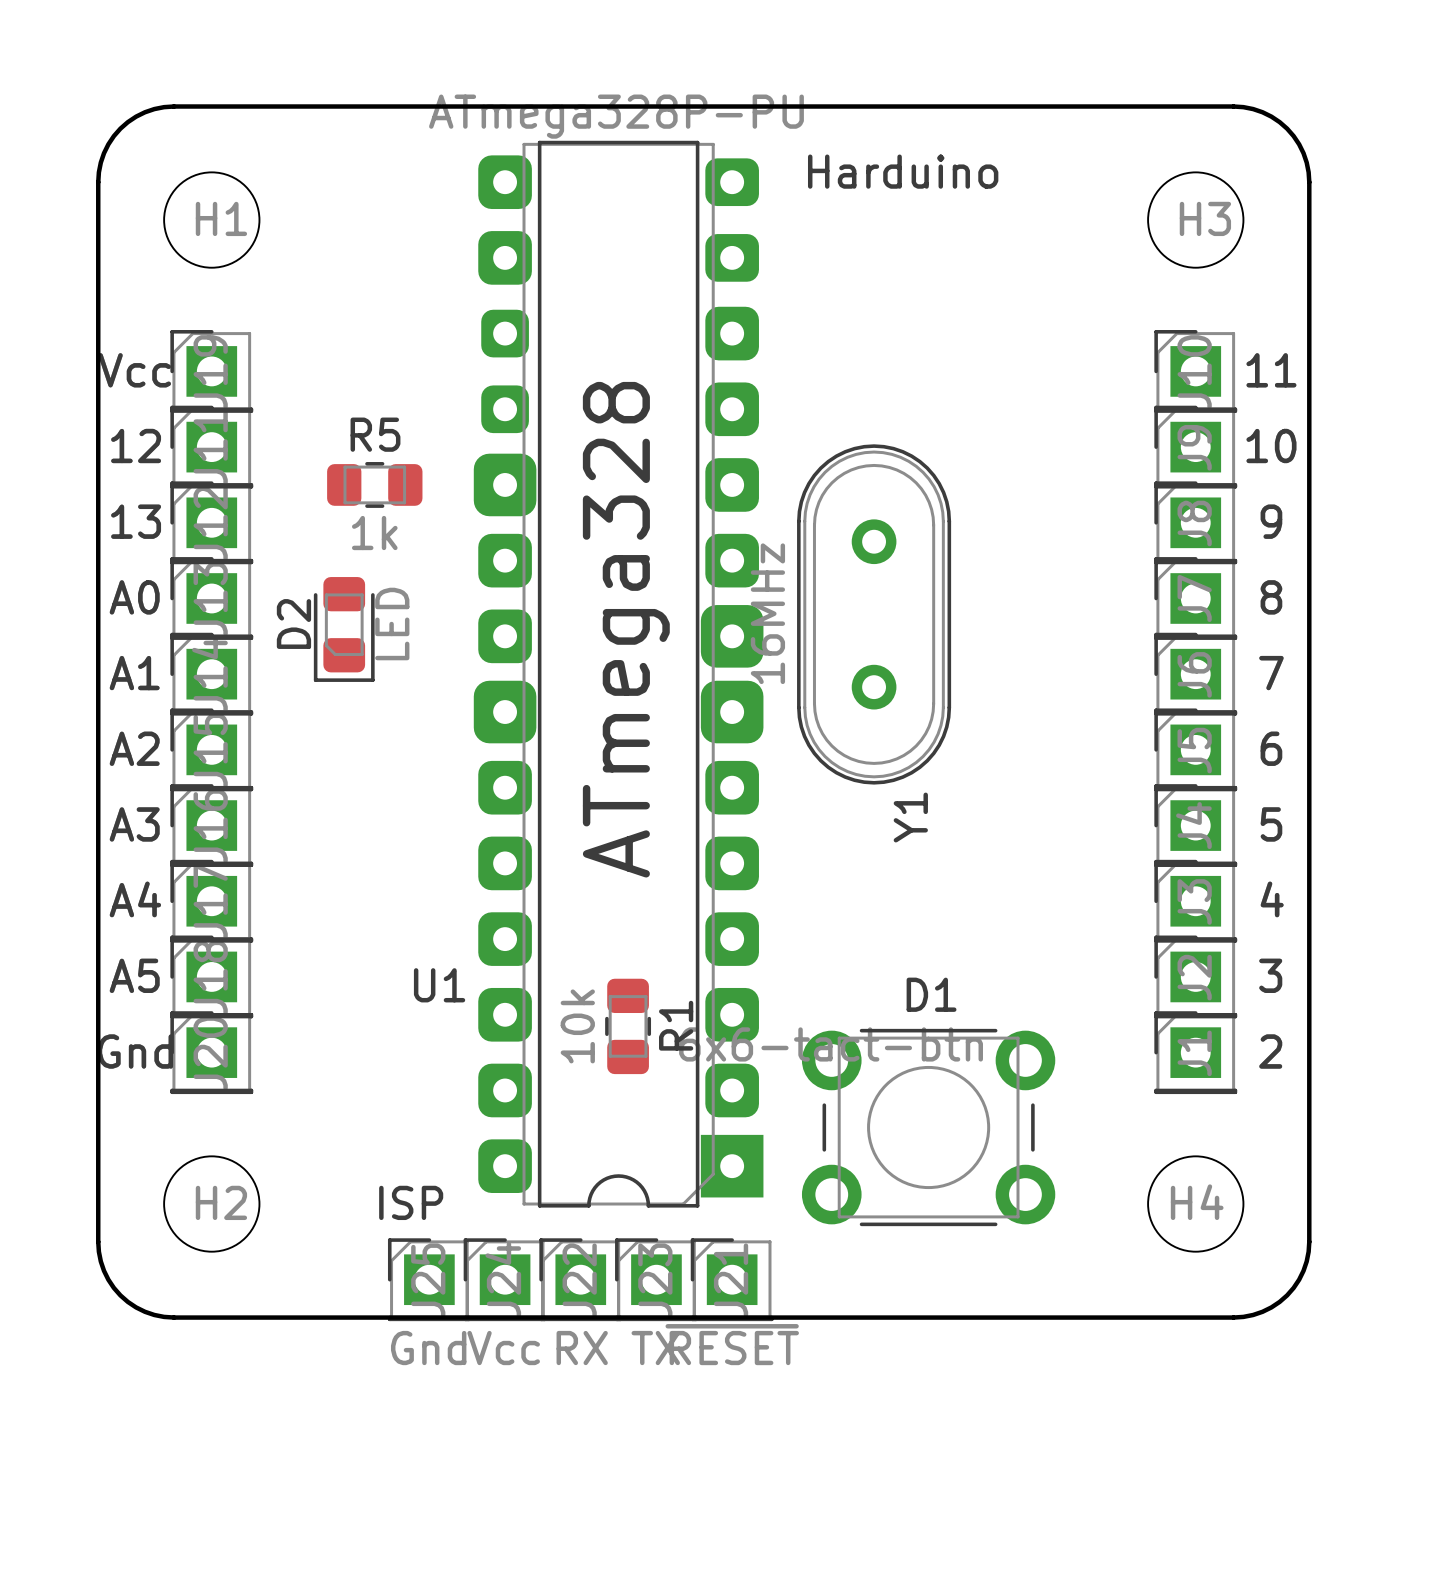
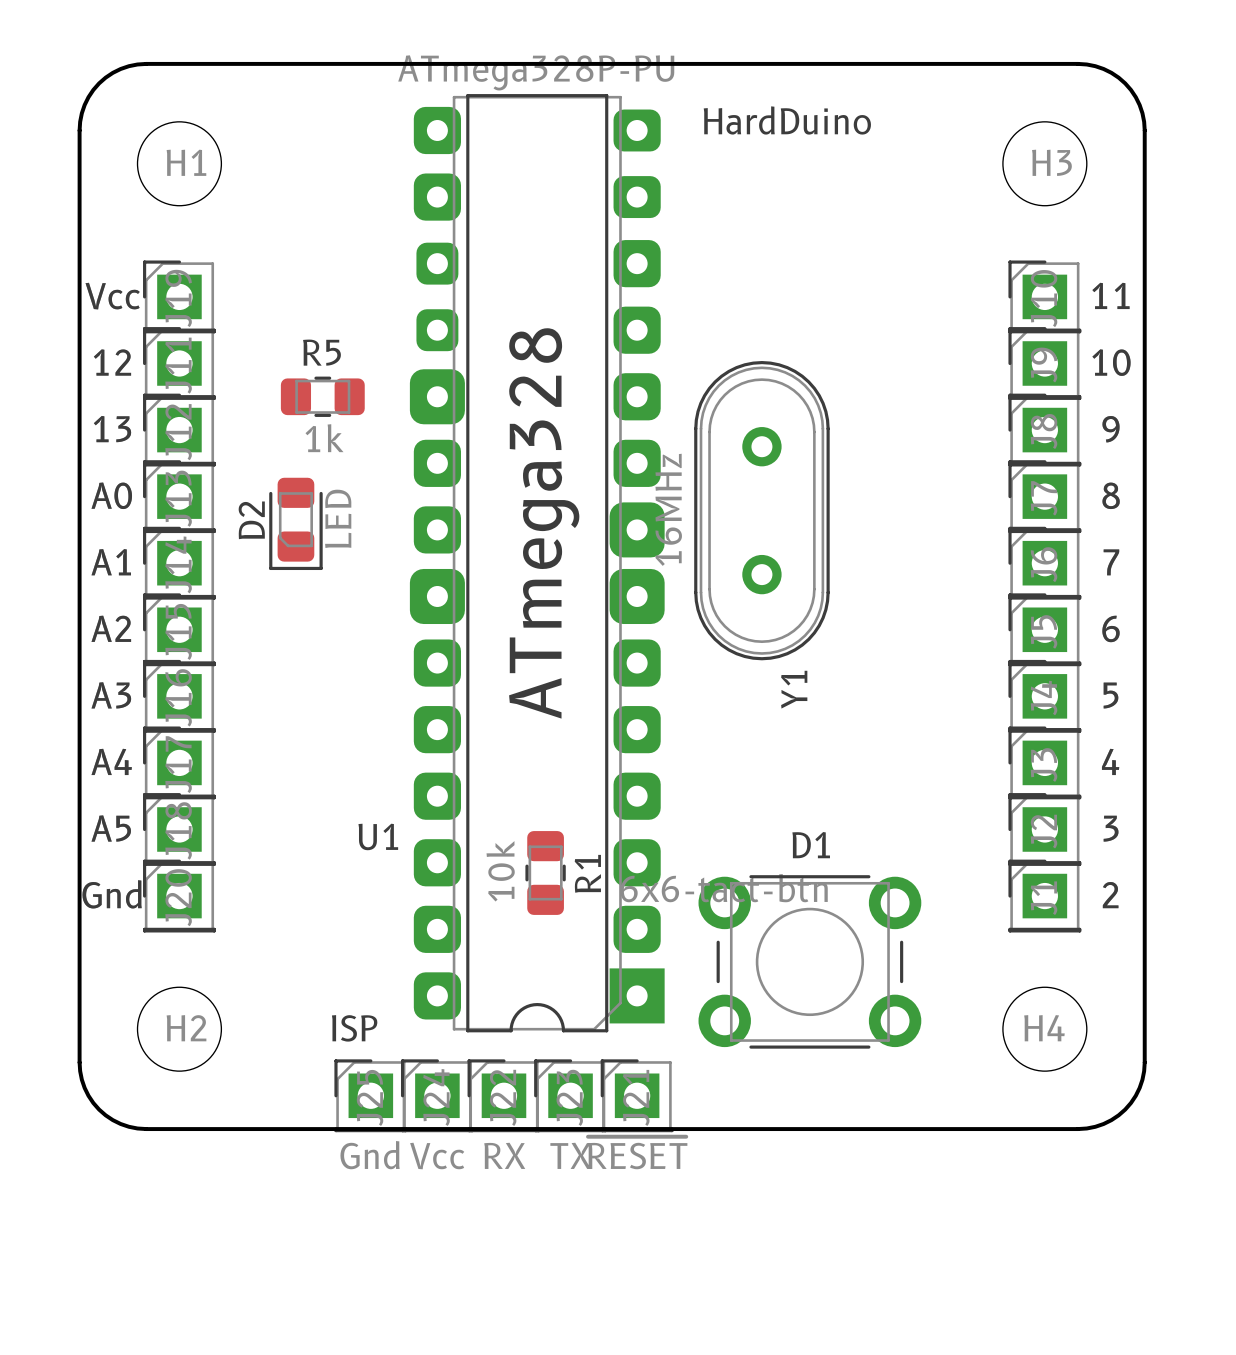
text: Harduino (903, 171) -> HardDuino (787, 120)

